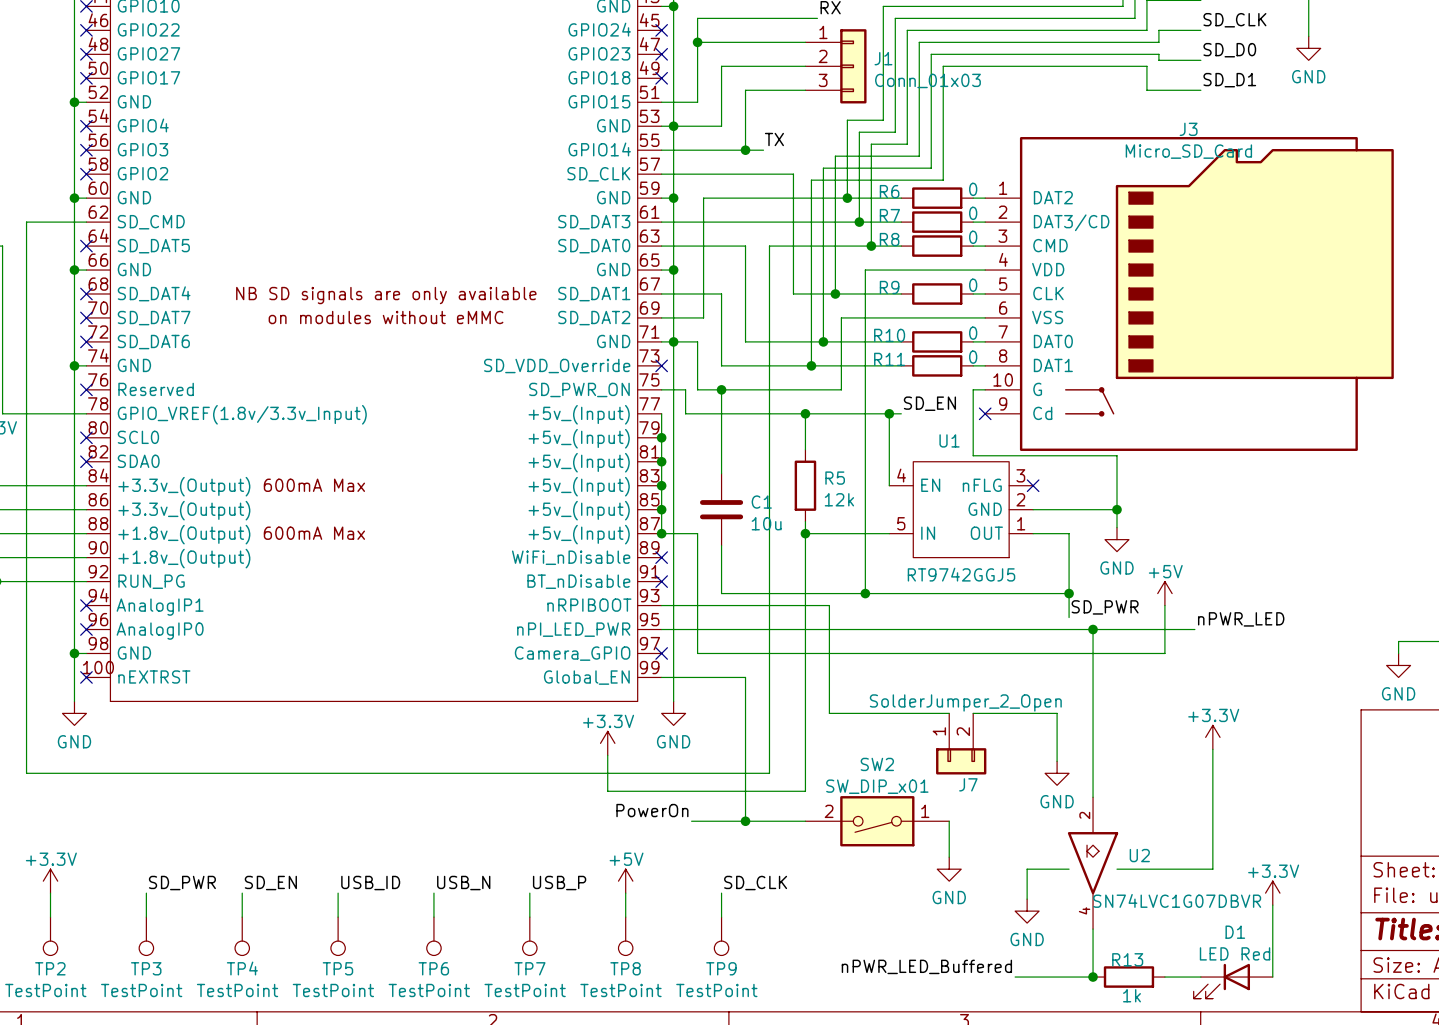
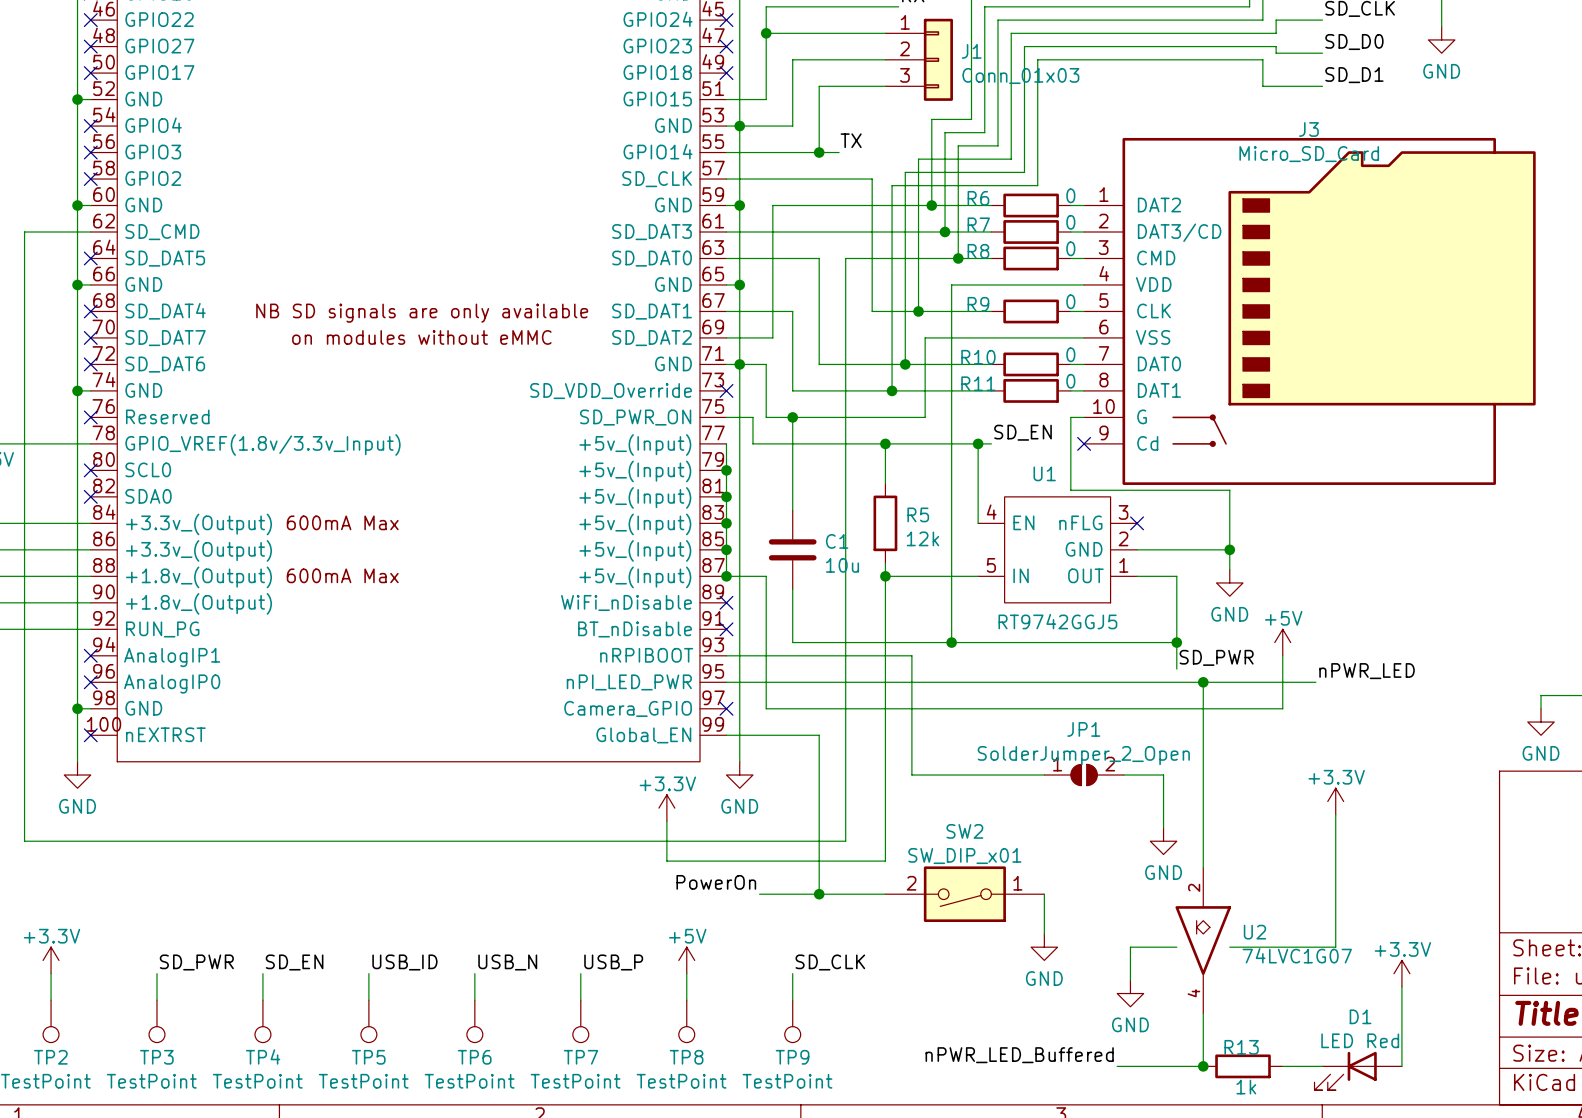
JP1: none -> SolderJumper_2_Open (1084, 775)
J7: SolderJumper_2_Open (961, 743) -> none
U2 value: SN74LVC1G07DBVR (1177, 900) -> 74LVC1G07 (1297, 955)

